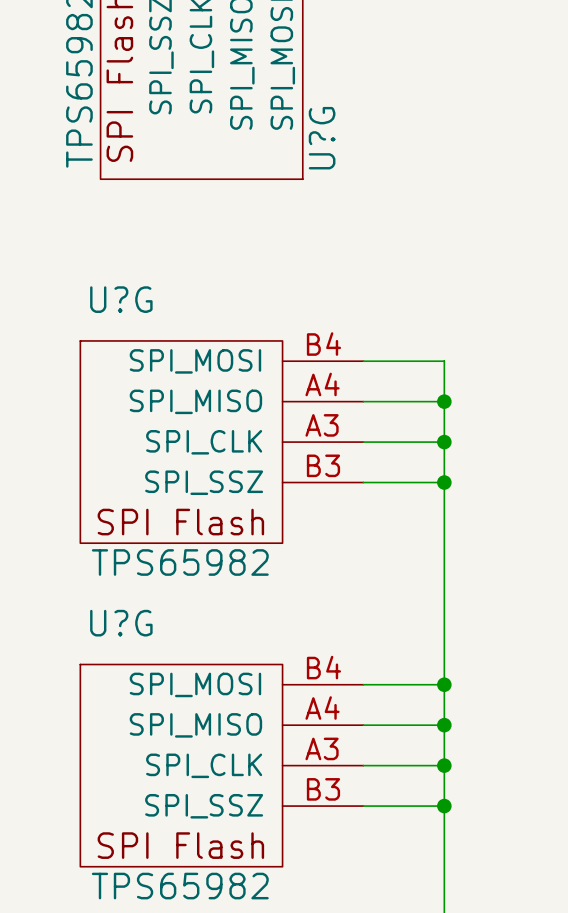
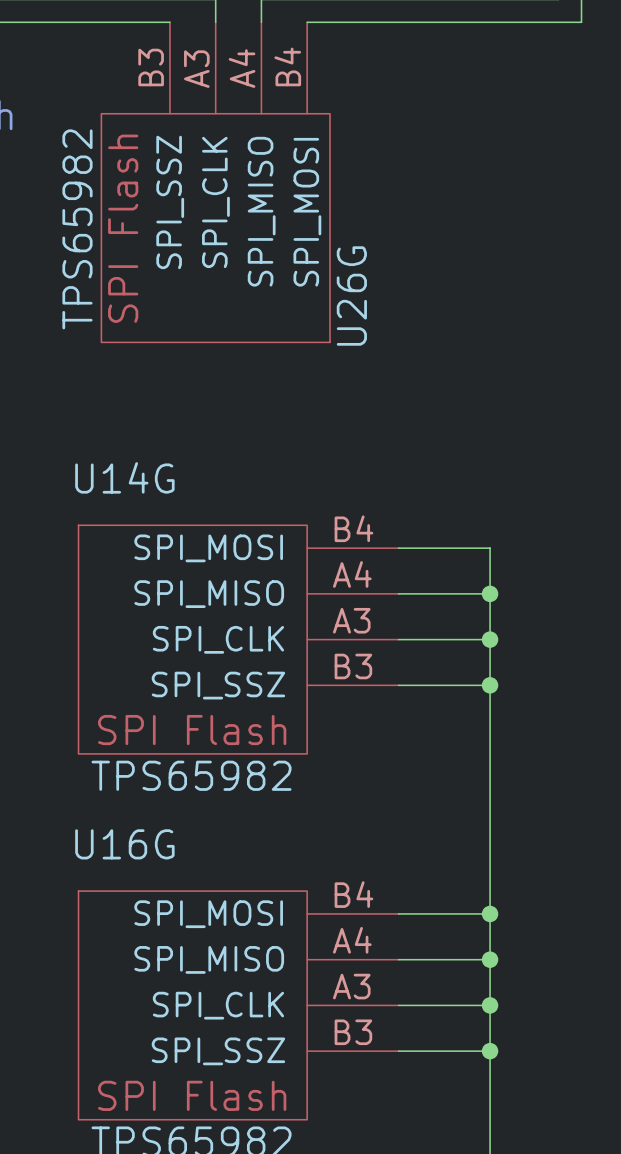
U?G name: U?G (322, 138) -> U26G (351, 296)
U?G name: U?G (121, 299) -> U14G (124, 477)
U?G name: U?G (121, 623) -> U16G (124, 844)

